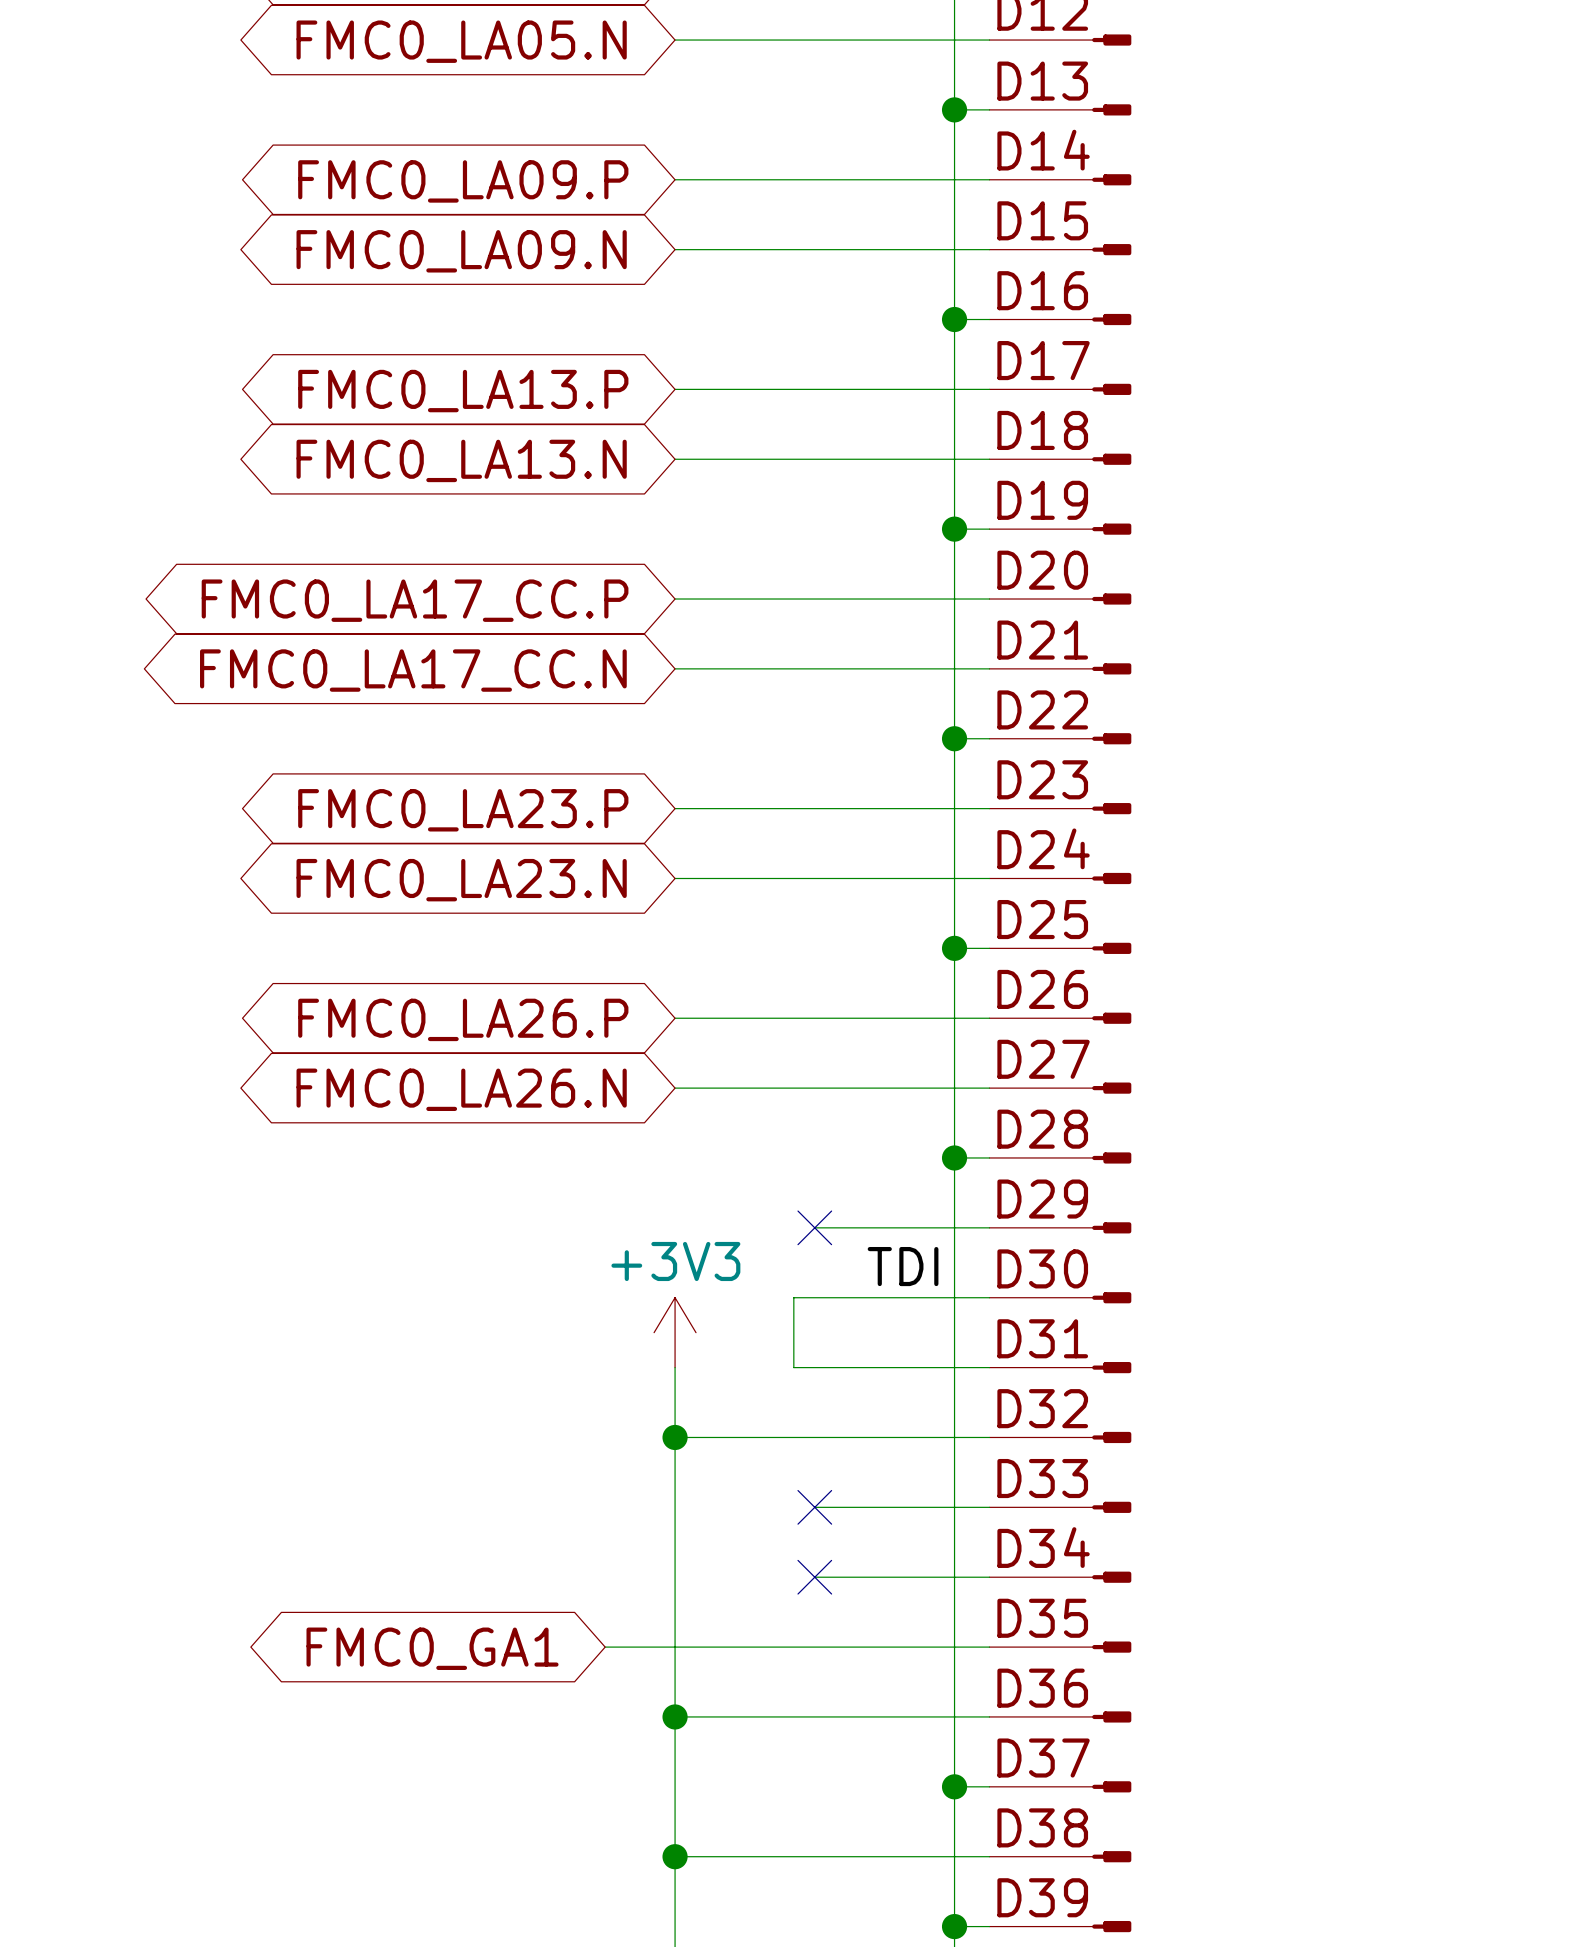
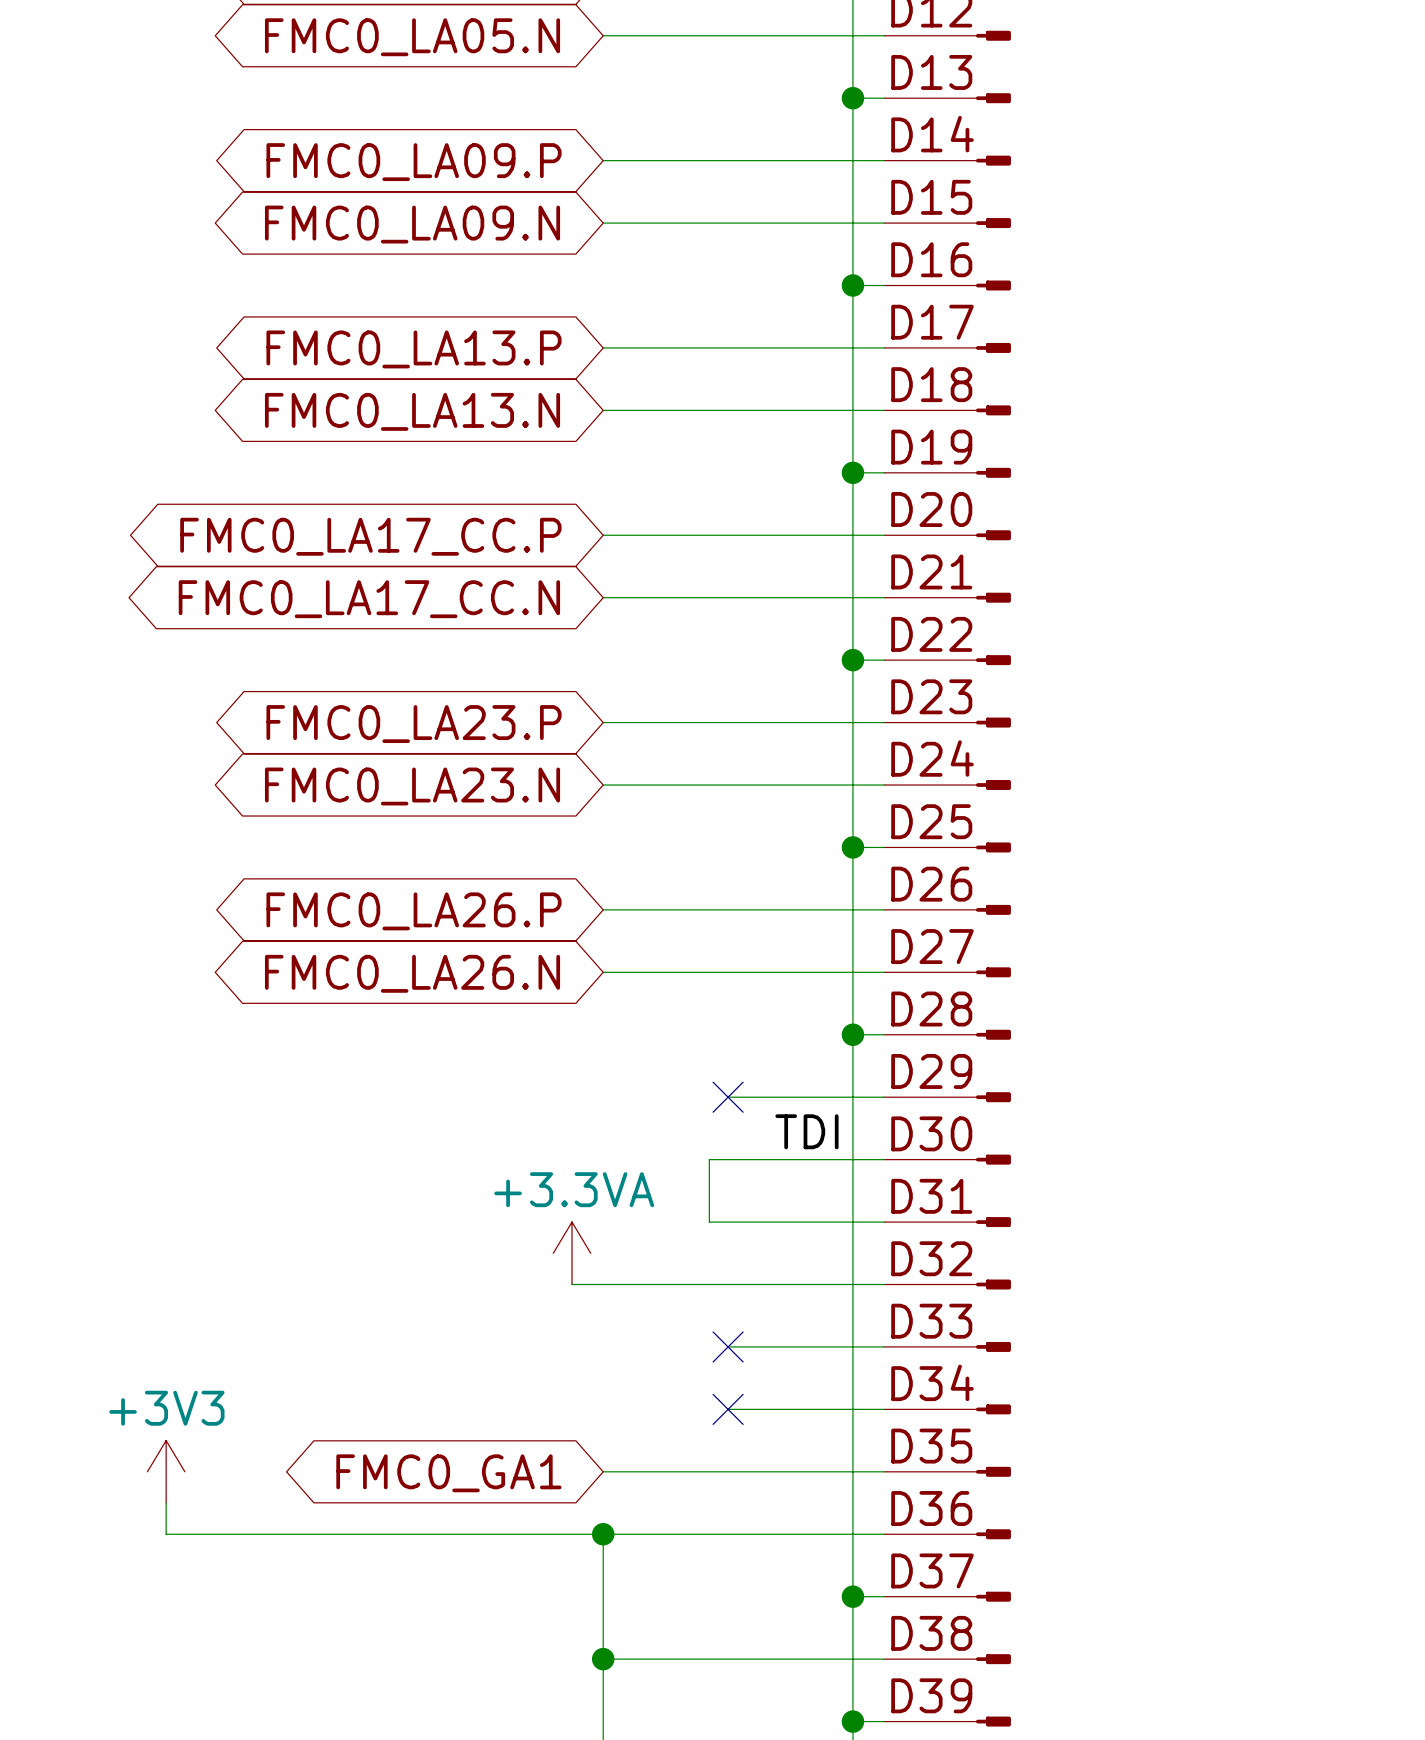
power symbol position: +3V3 (675, 1332) -> +3V3 (166, 1471)
wire: (675, 1367) (675, 1716) -> (166, 1503) (166, 1534) (603, 1534)
power symbol: none -> +3.3VA (572, 1253)
wire: none -> (572, 1284) (603, 1284)
junction: (675, 1437) -> none
wire: (605, 1647) (675, 1647) -> none
global label position: FMC0_GA1 (432, 1648) -> FMC0_GA1 (448, 1473)

